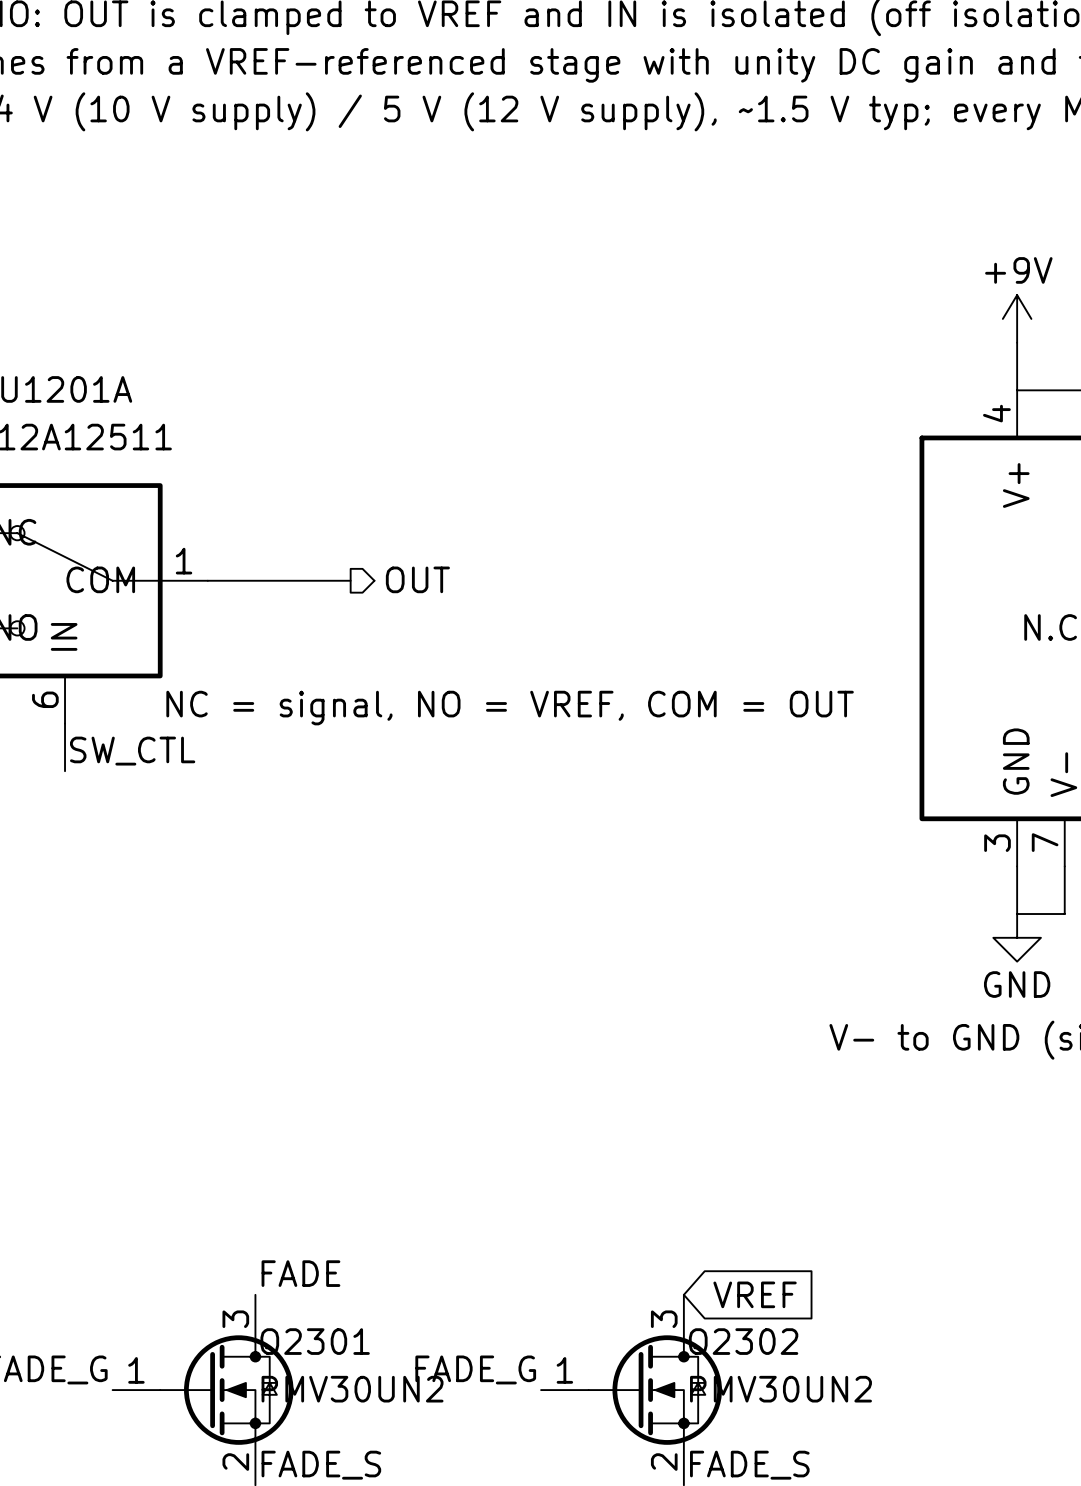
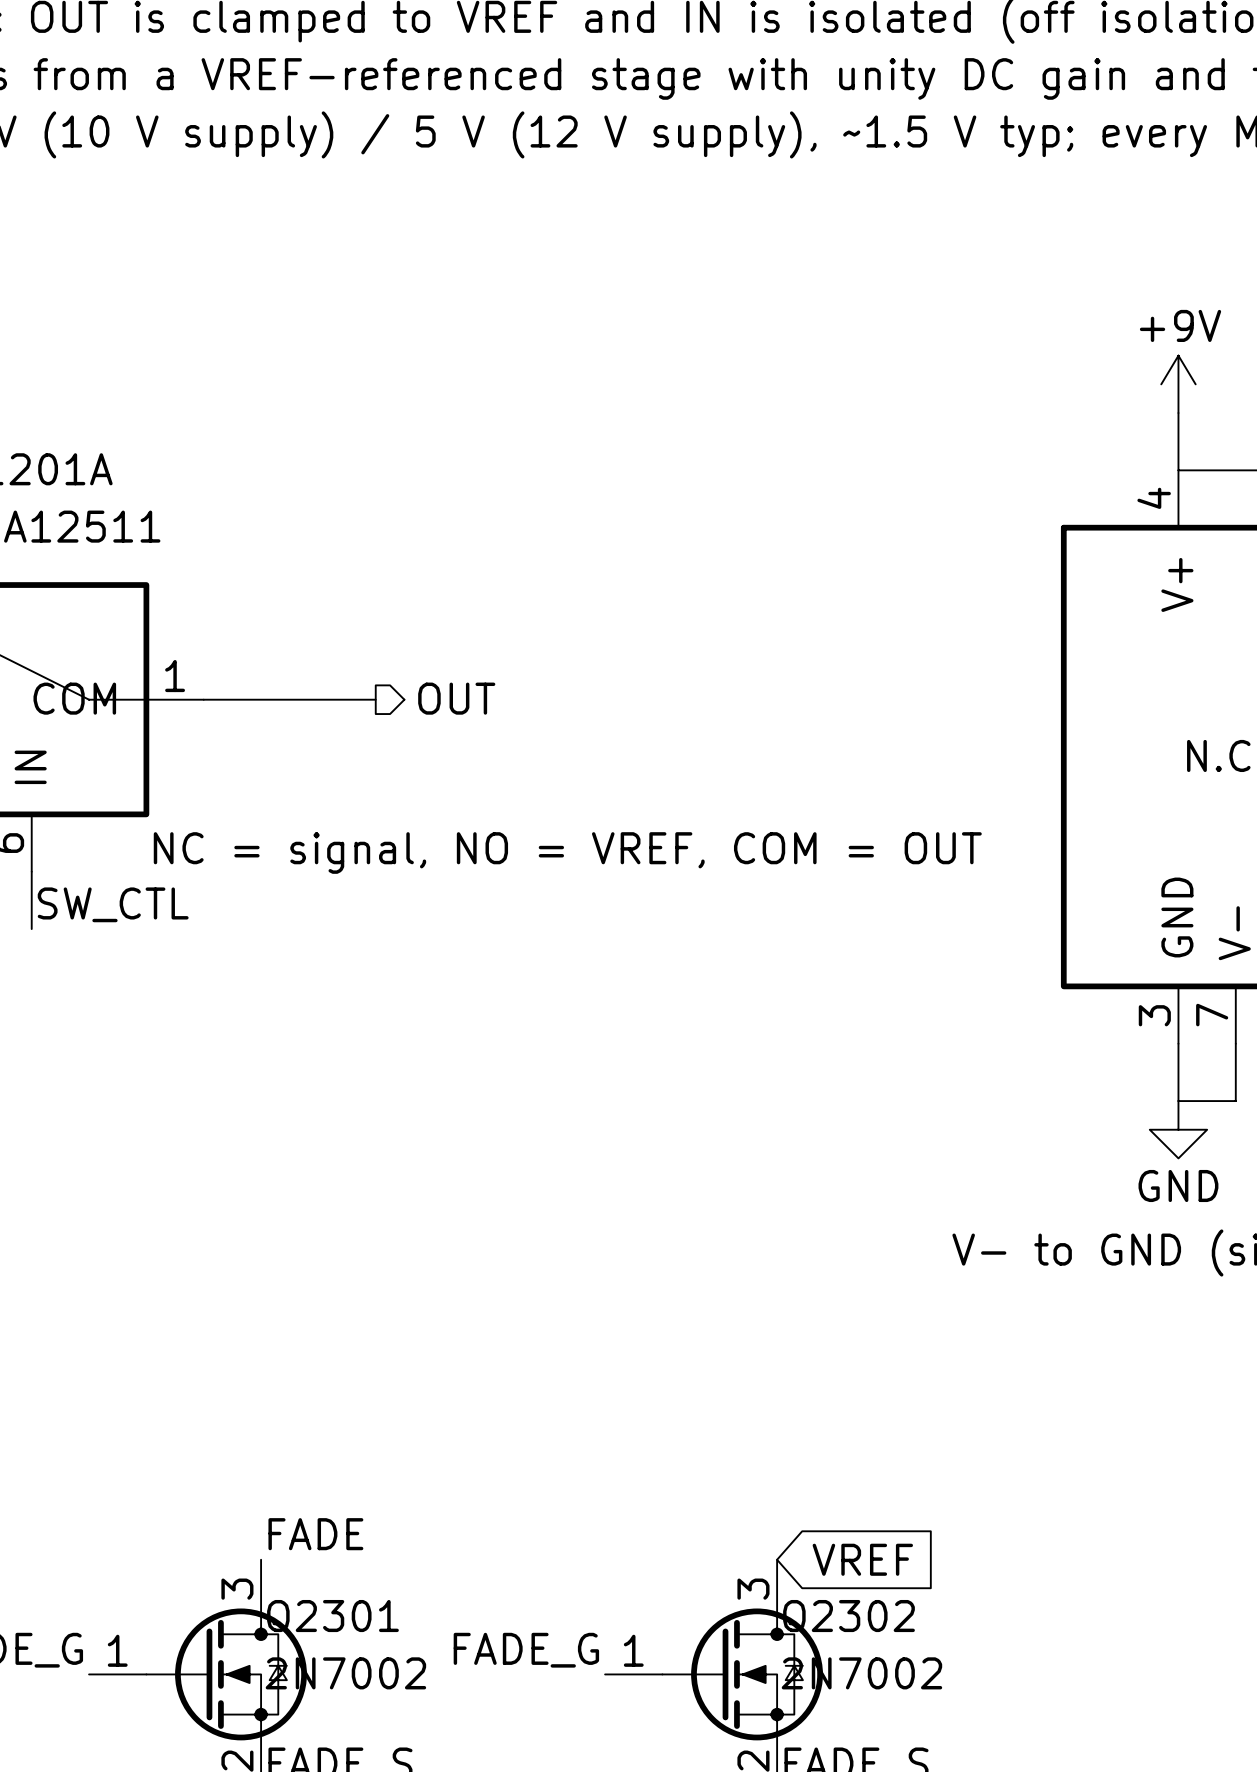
Q2301 value: PMV30UN2 (352, 1389) -> 2N7002 (345, 1673)
Q2302 value: PMV30UN2 (780, 1389) -> 2N7002 (861, 1673)

